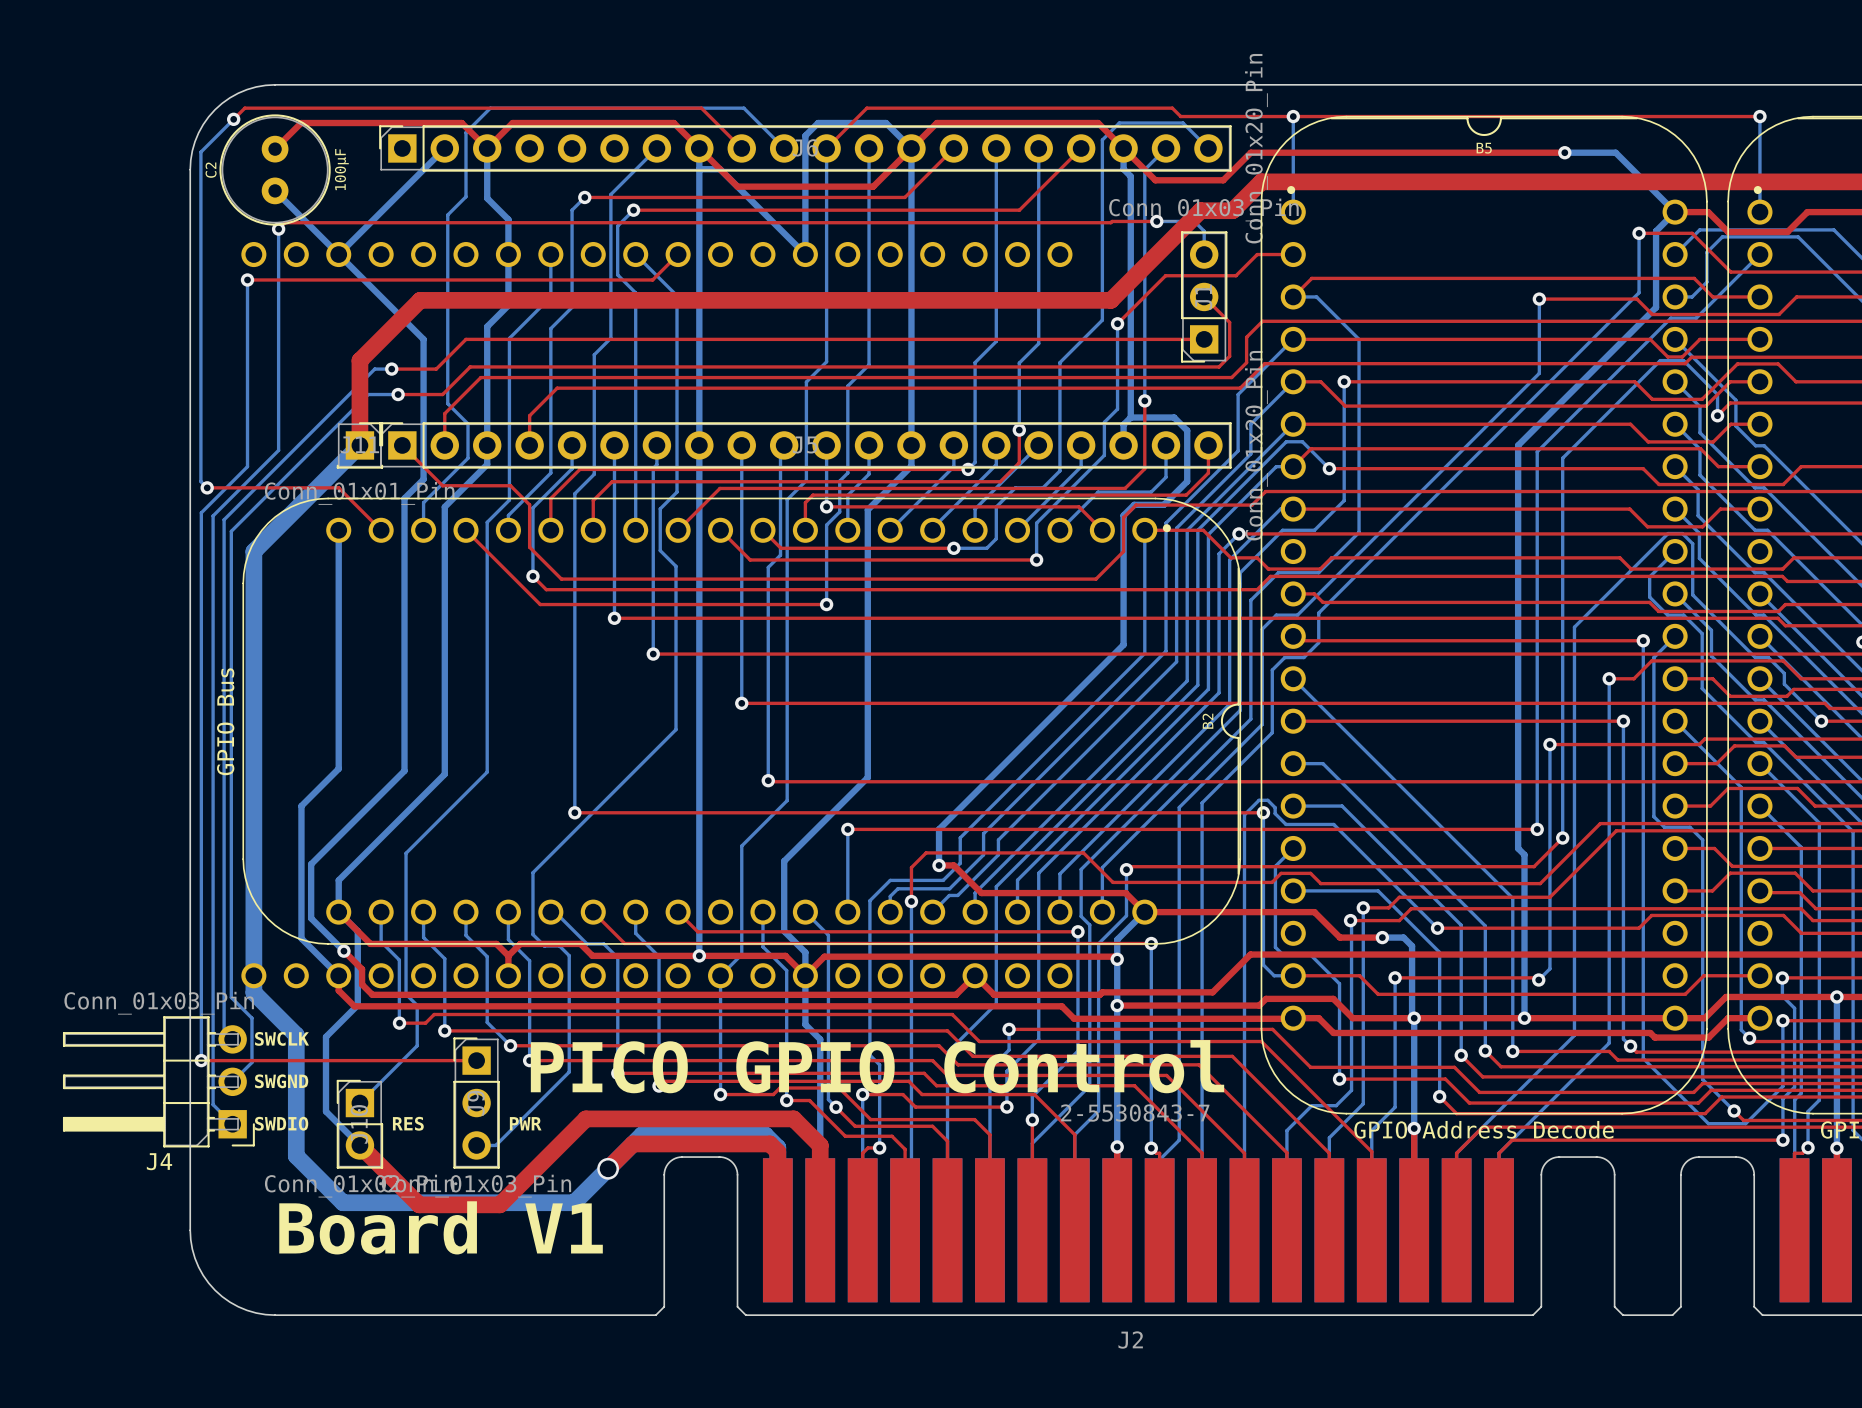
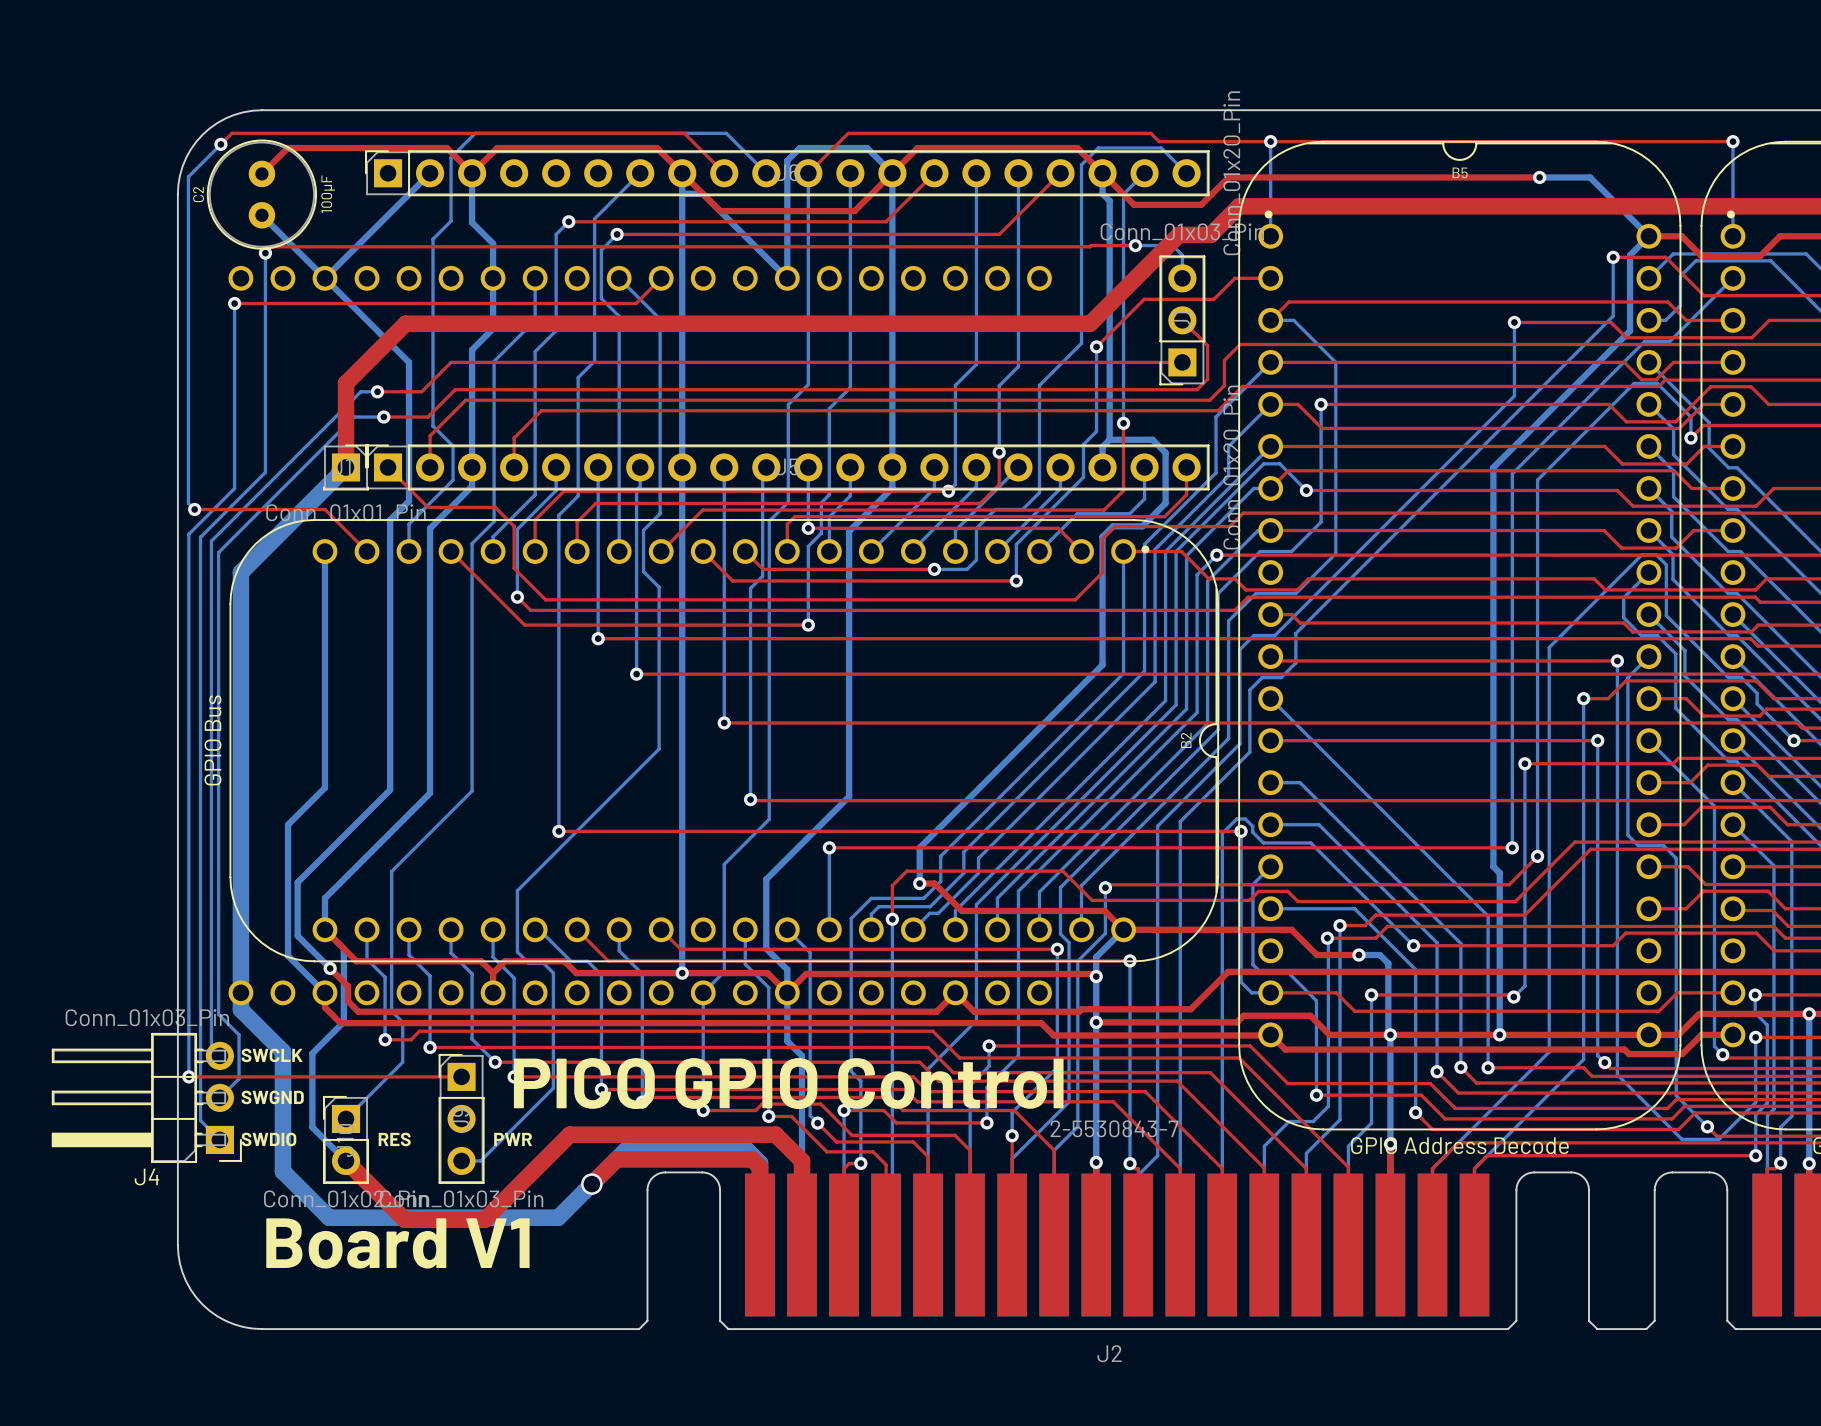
top track: (1293, 1018) (1318, 1018) (1333, 1032) -> (1270, 1034) (1285, 1049) (1310, 1049)

